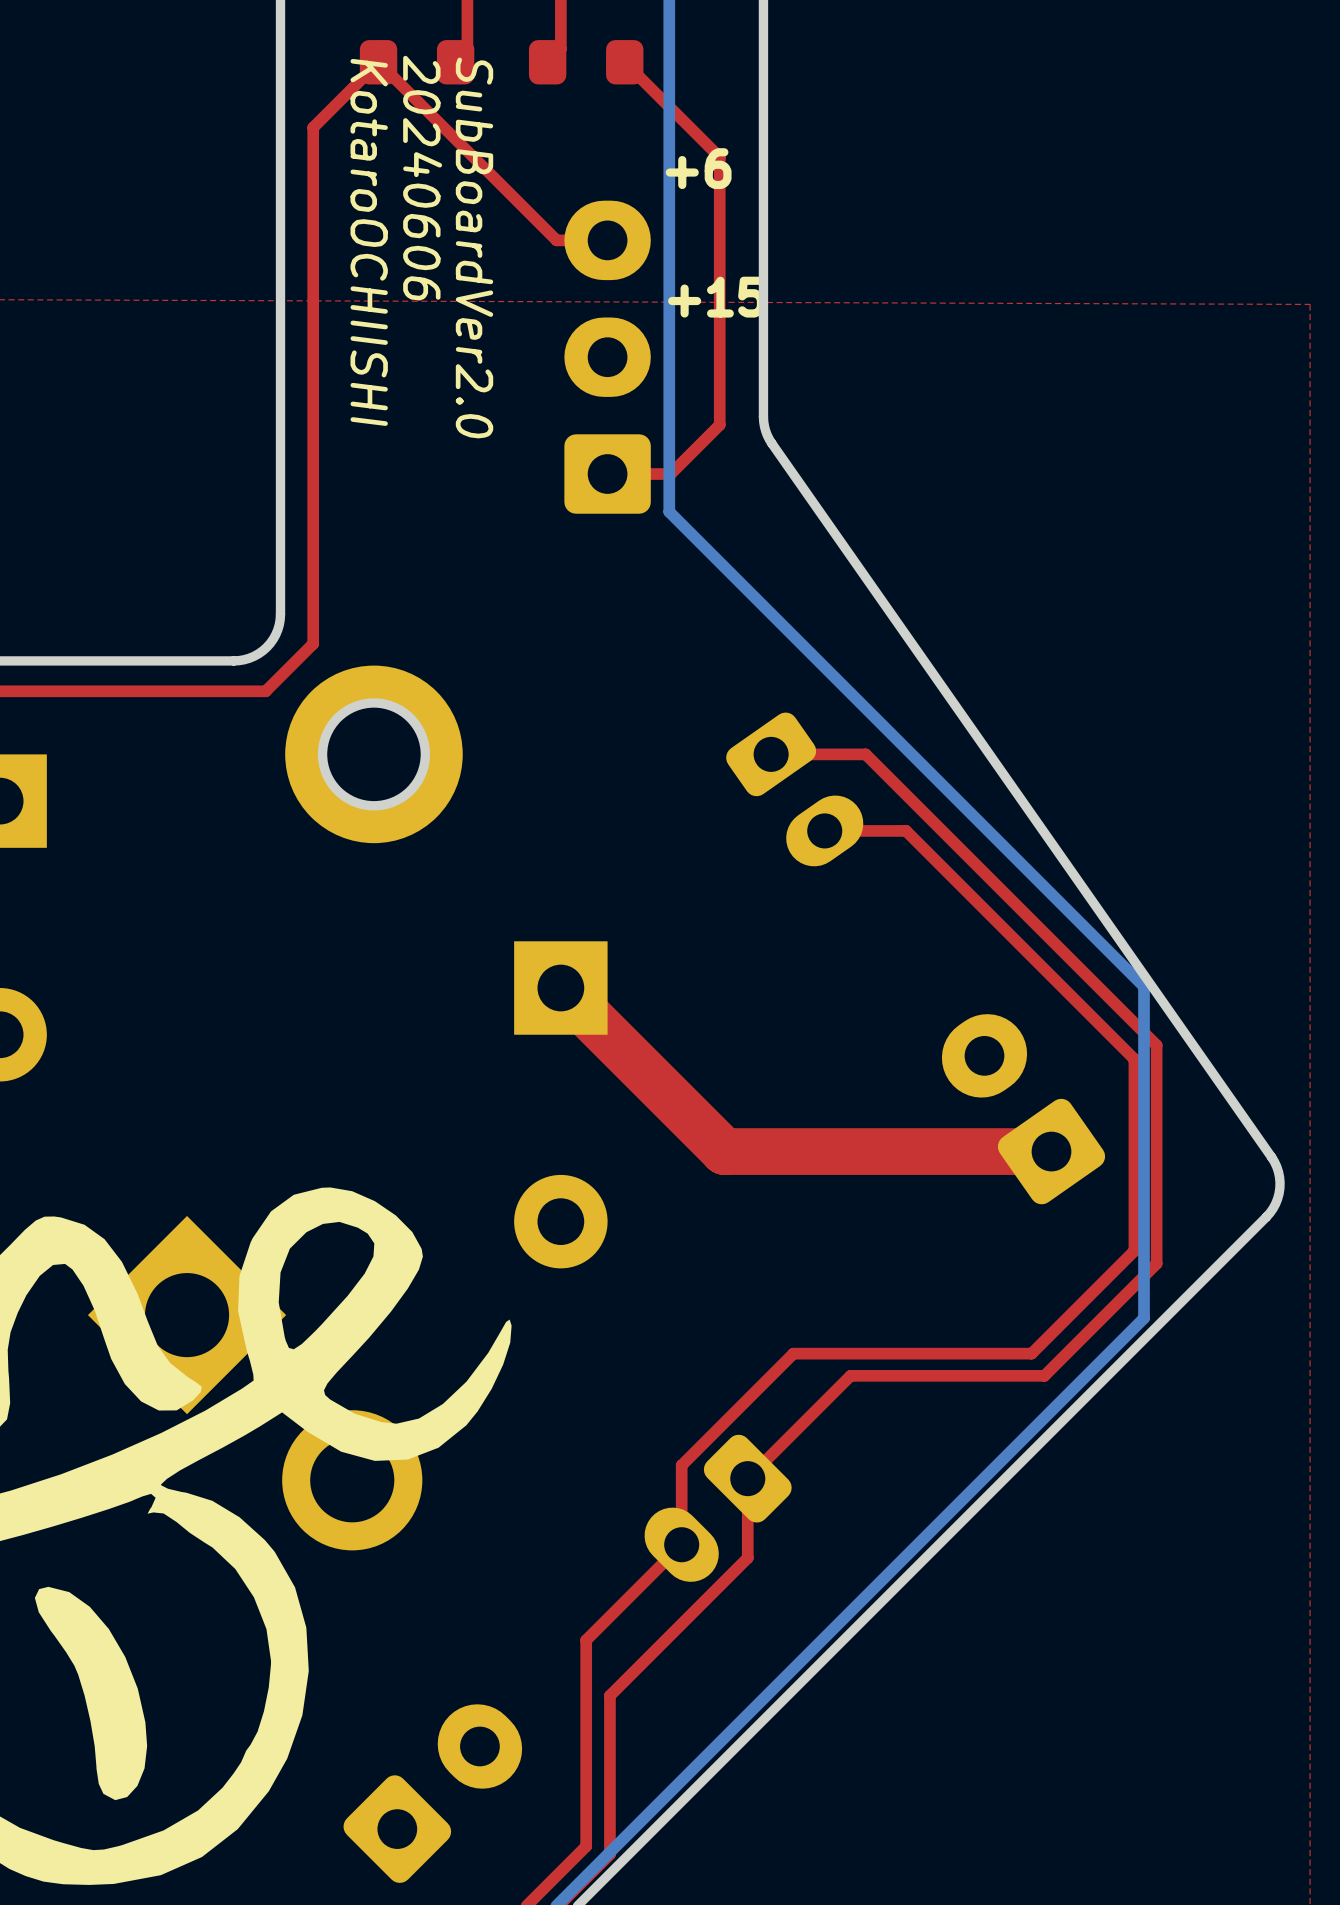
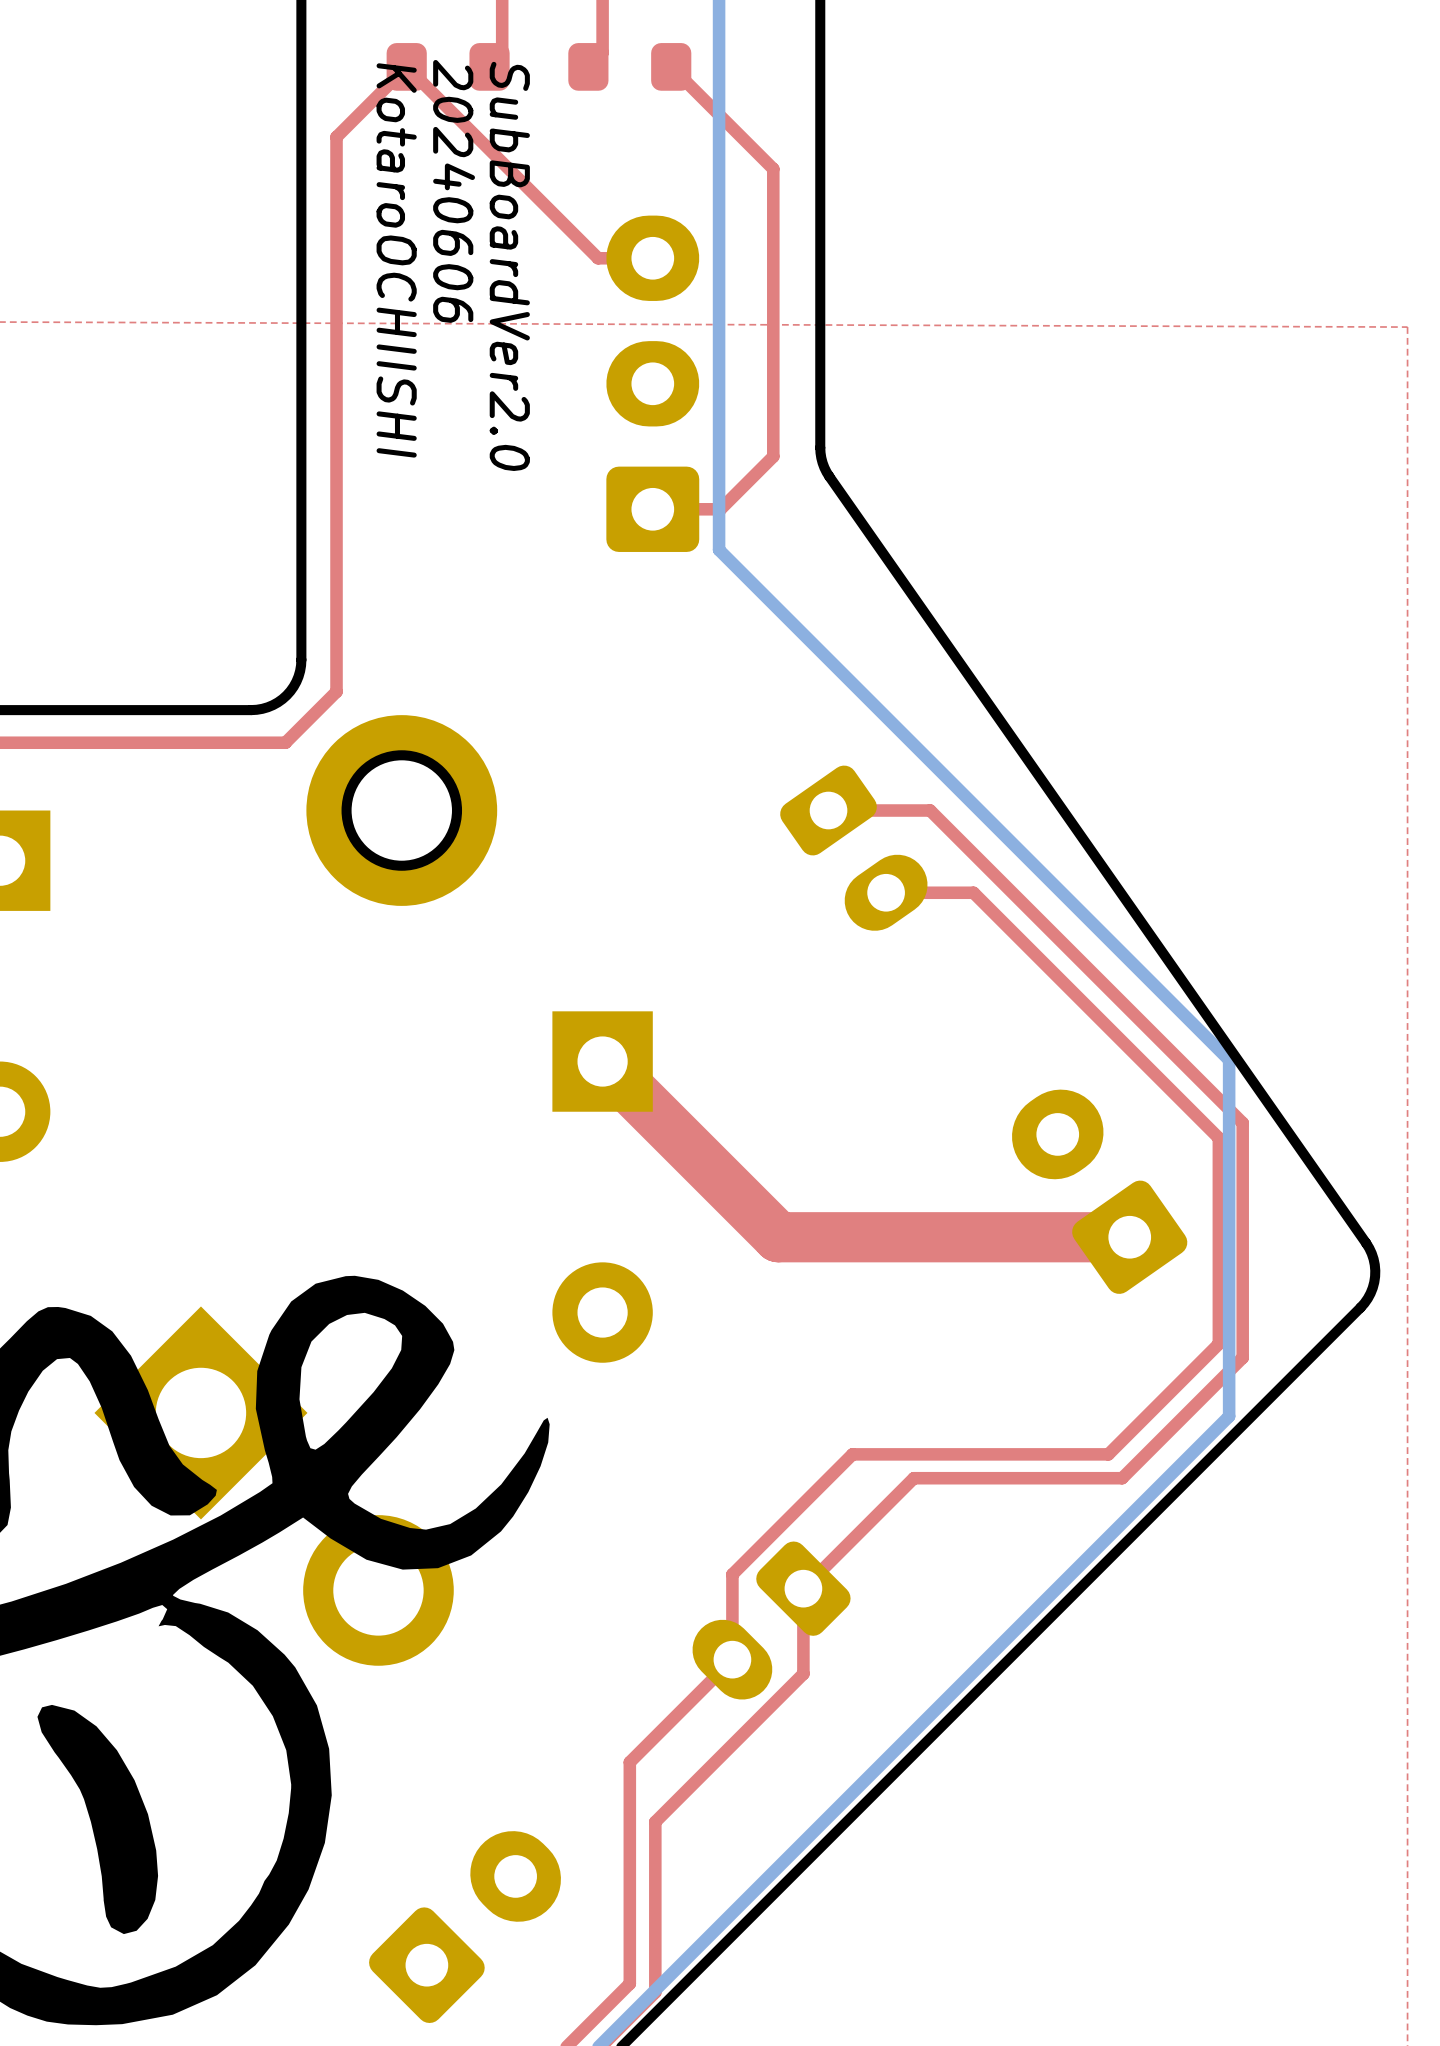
text: +6 (698, 168) -> none
text: +15 (716, 297) -> none

